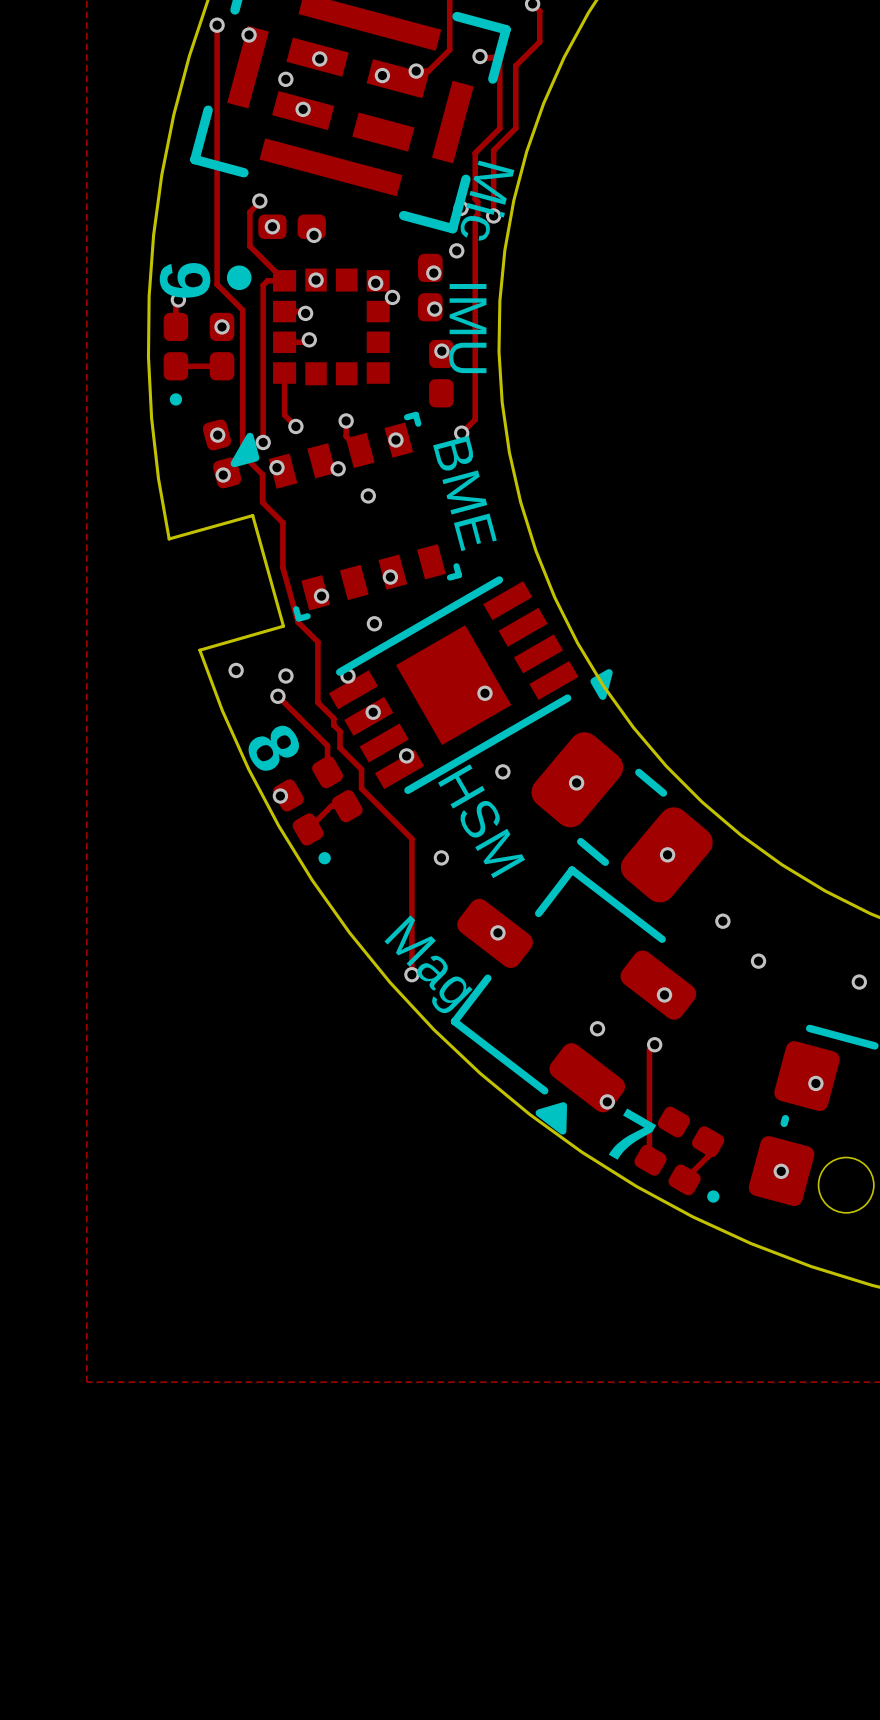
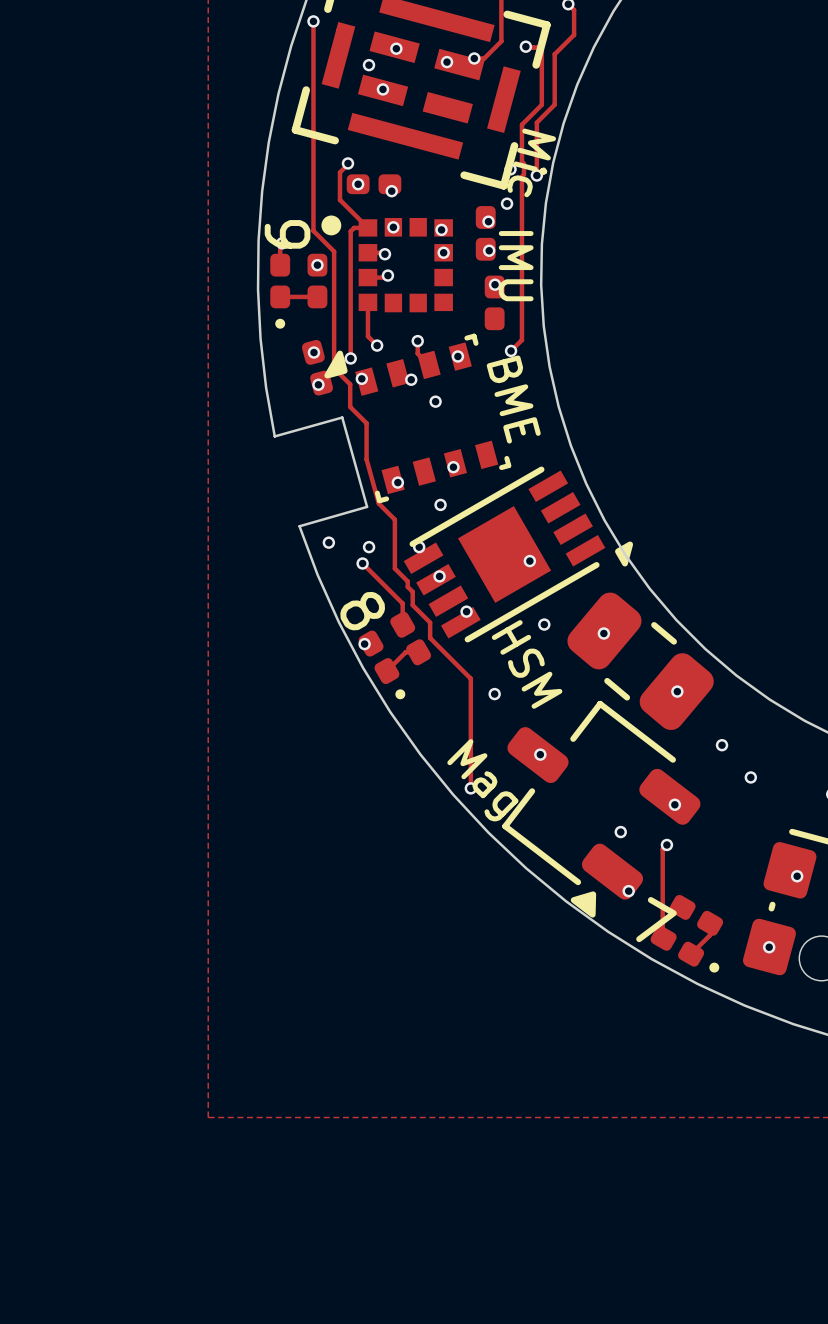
via: (249, 35) -> none
via position: (392, 297) -> (443, 252)

